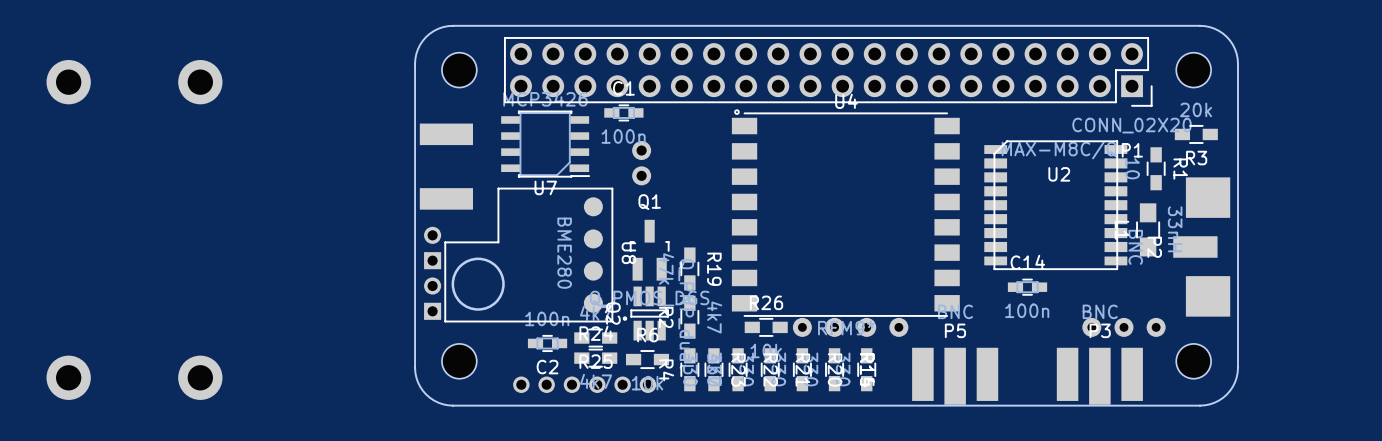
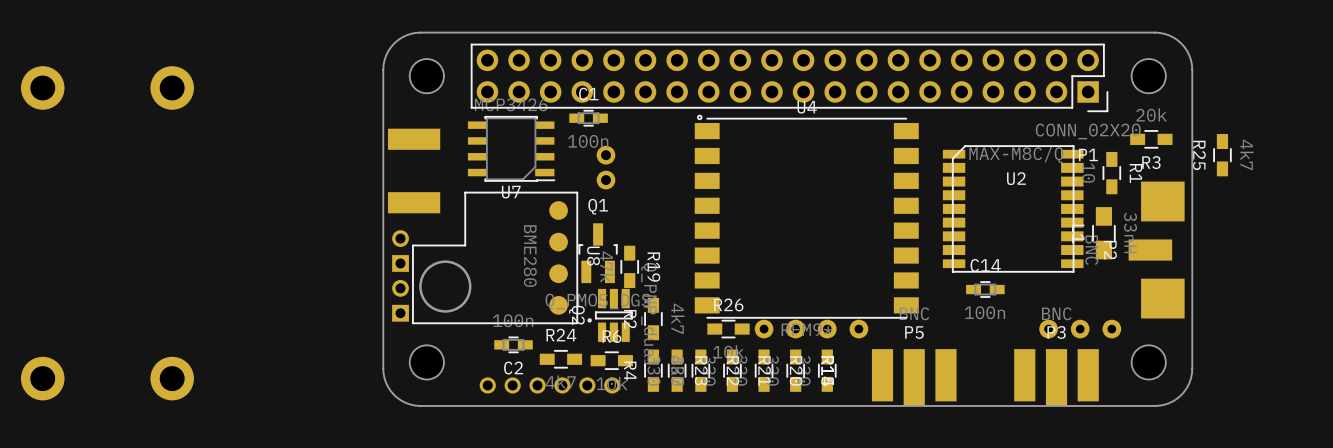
Q1 position: (649, 250) -> (598, 253)
R19 position: (689, 268) -> (629, 266)
R25 rotation: 0° (595, 338) -> 90° clockwise (1222, 155)
R25 position: (595, 338) -> (1222, 155)

